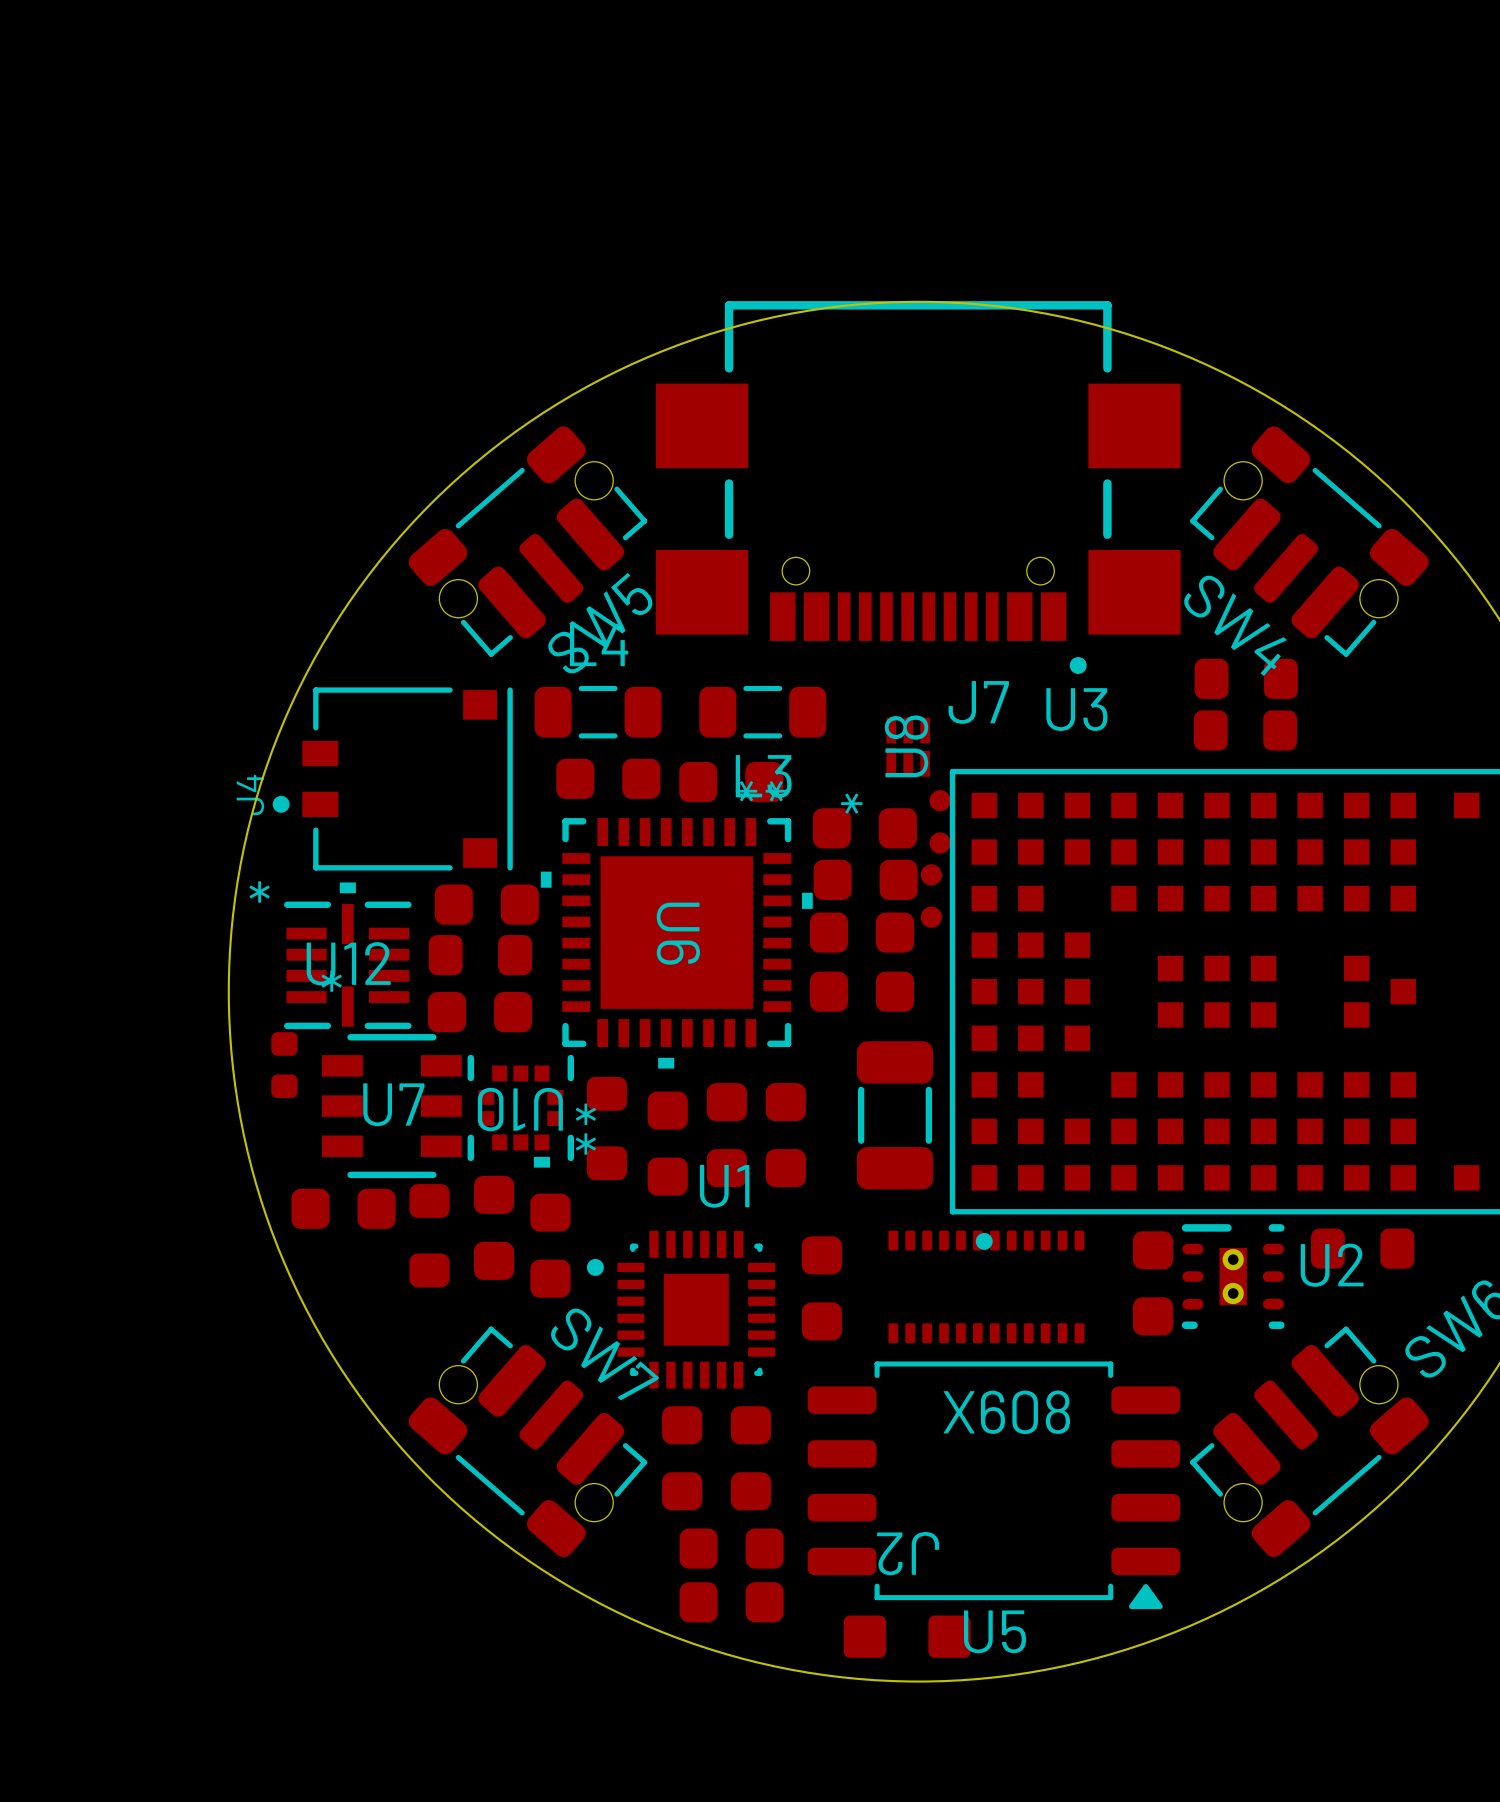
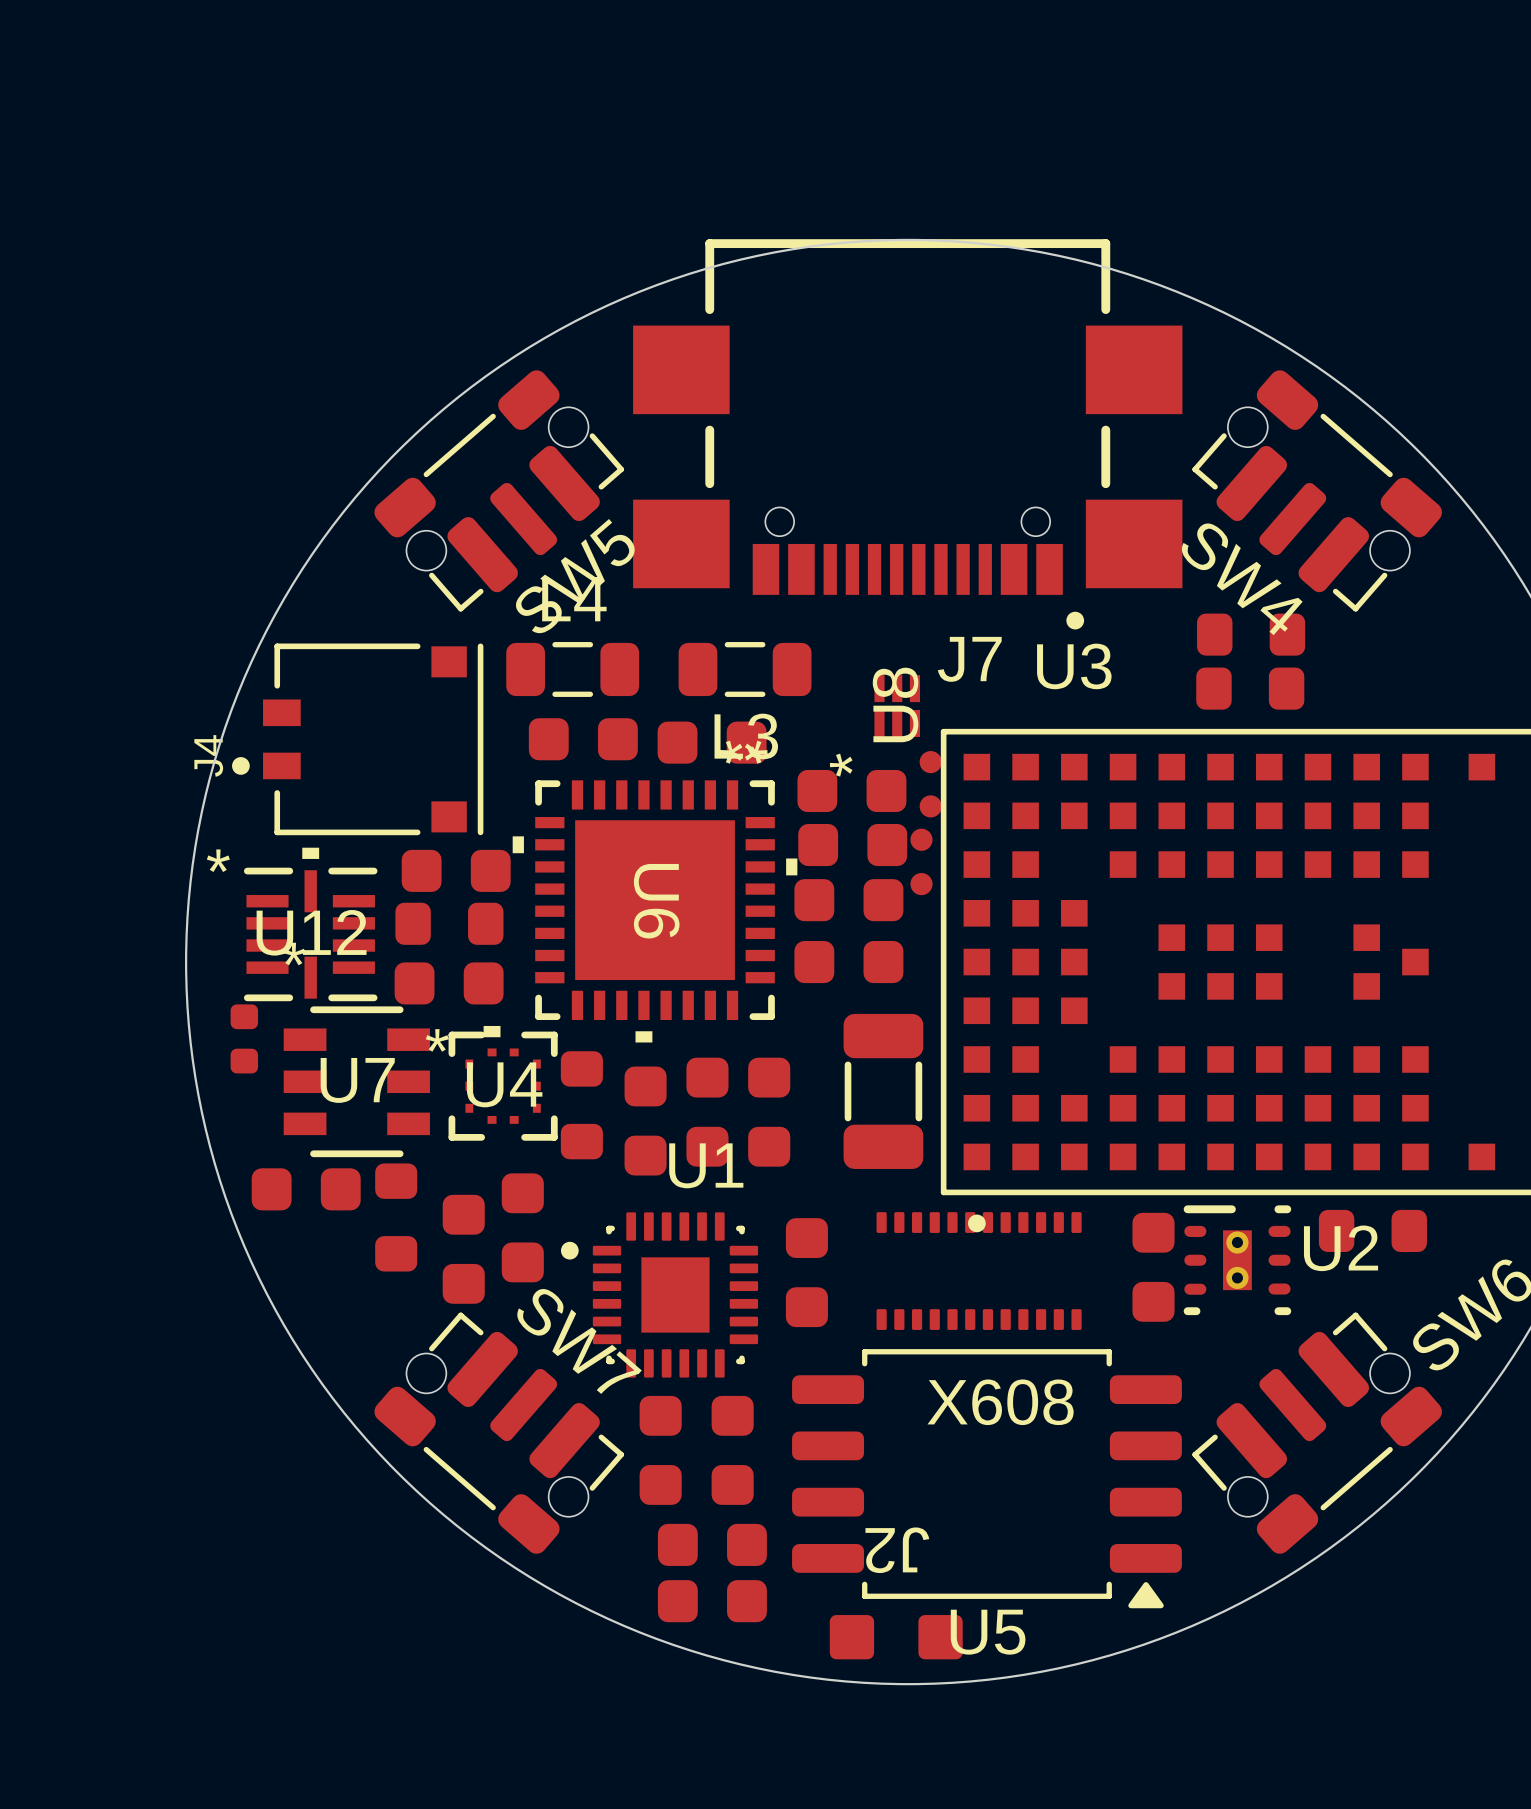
U4: none -> (503, 1083)
U10: (520, 1111) -> none
part position: (494, 1227) -> (463, 1249)

